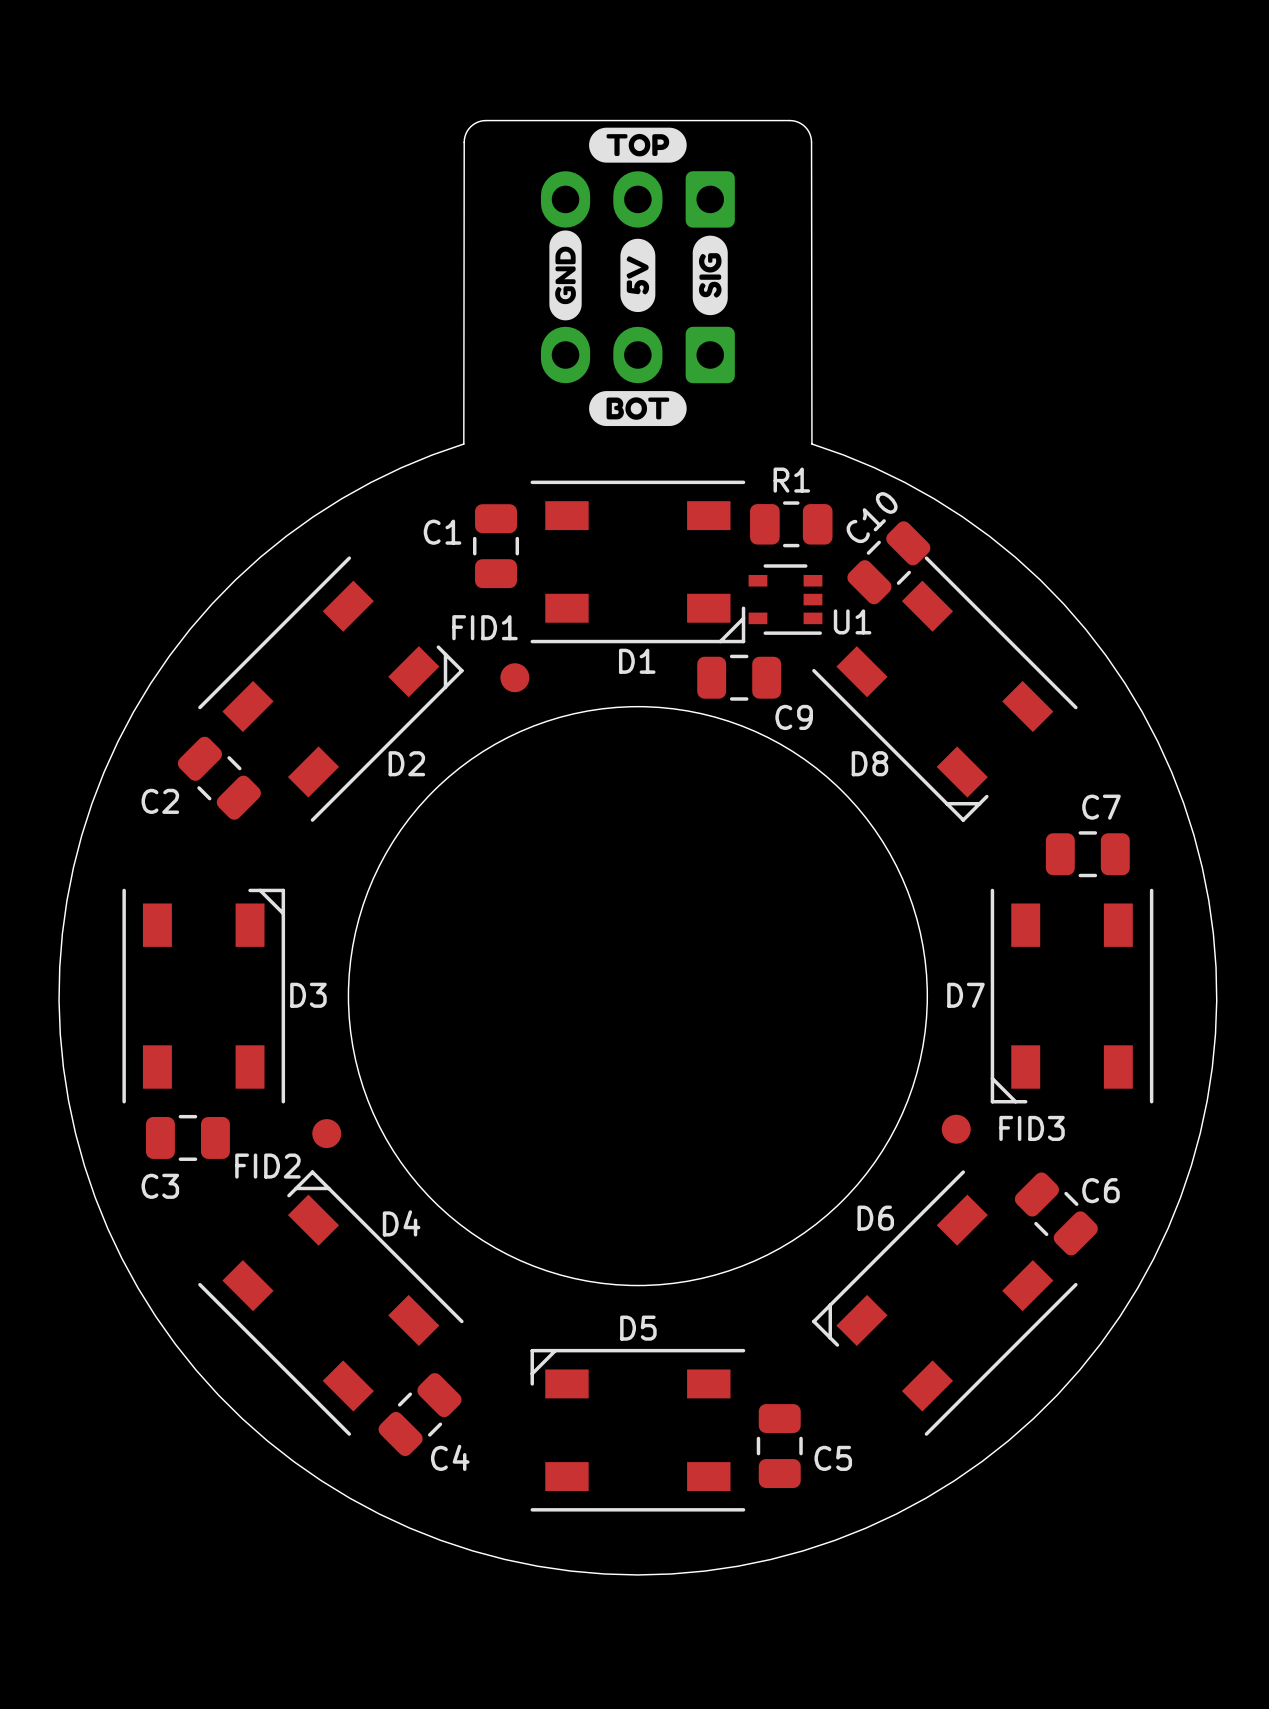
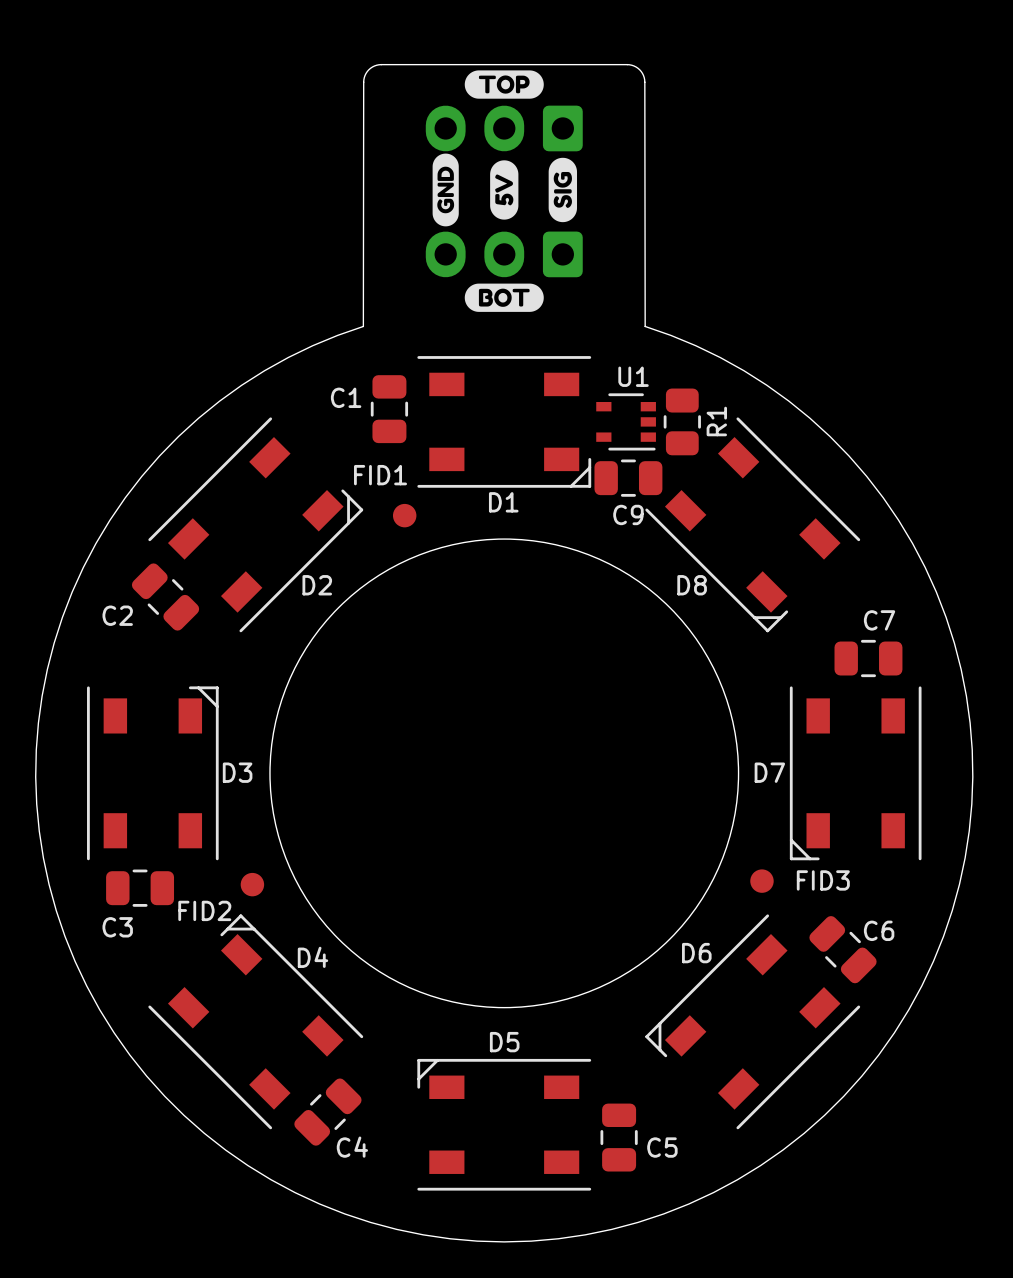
R1 rotation: 0° (791, 524) -> 90° clockwise (682, 421)
R1 position: (791, 524) -> (682, 421)
C10: (888, 562) -> none
U1 position: (785, 599) -> (626, 421)
U1 name position: U1 (852, 621) -> U1 (633, 376)
C9 position: (739, 677) -> (628, 478)
C9 name position: C9 (794, 717) -> C9 (628, 514)

